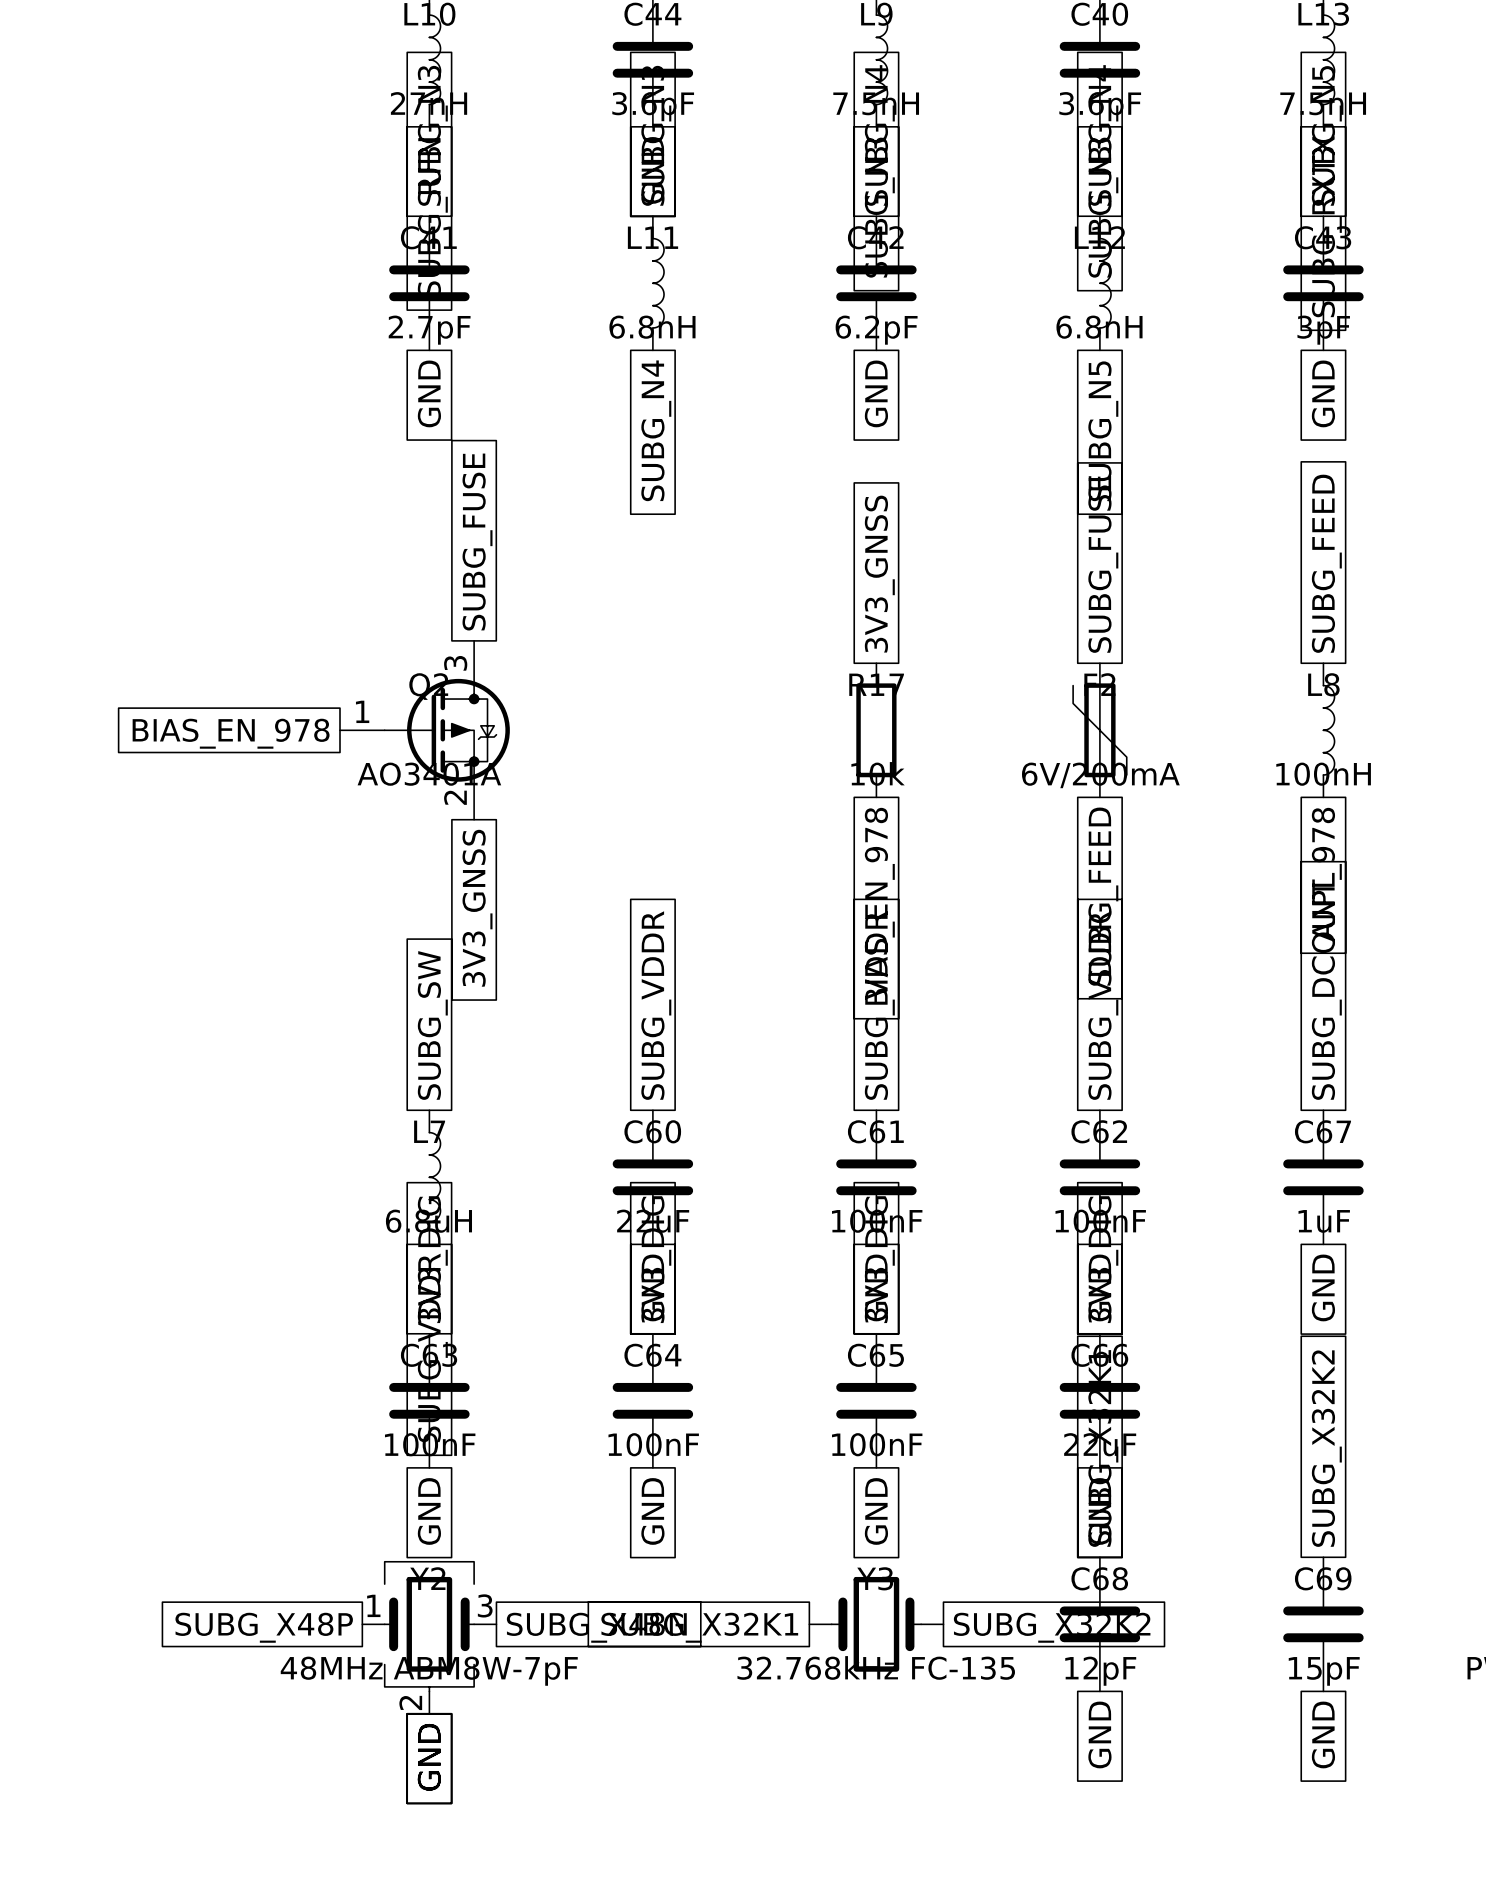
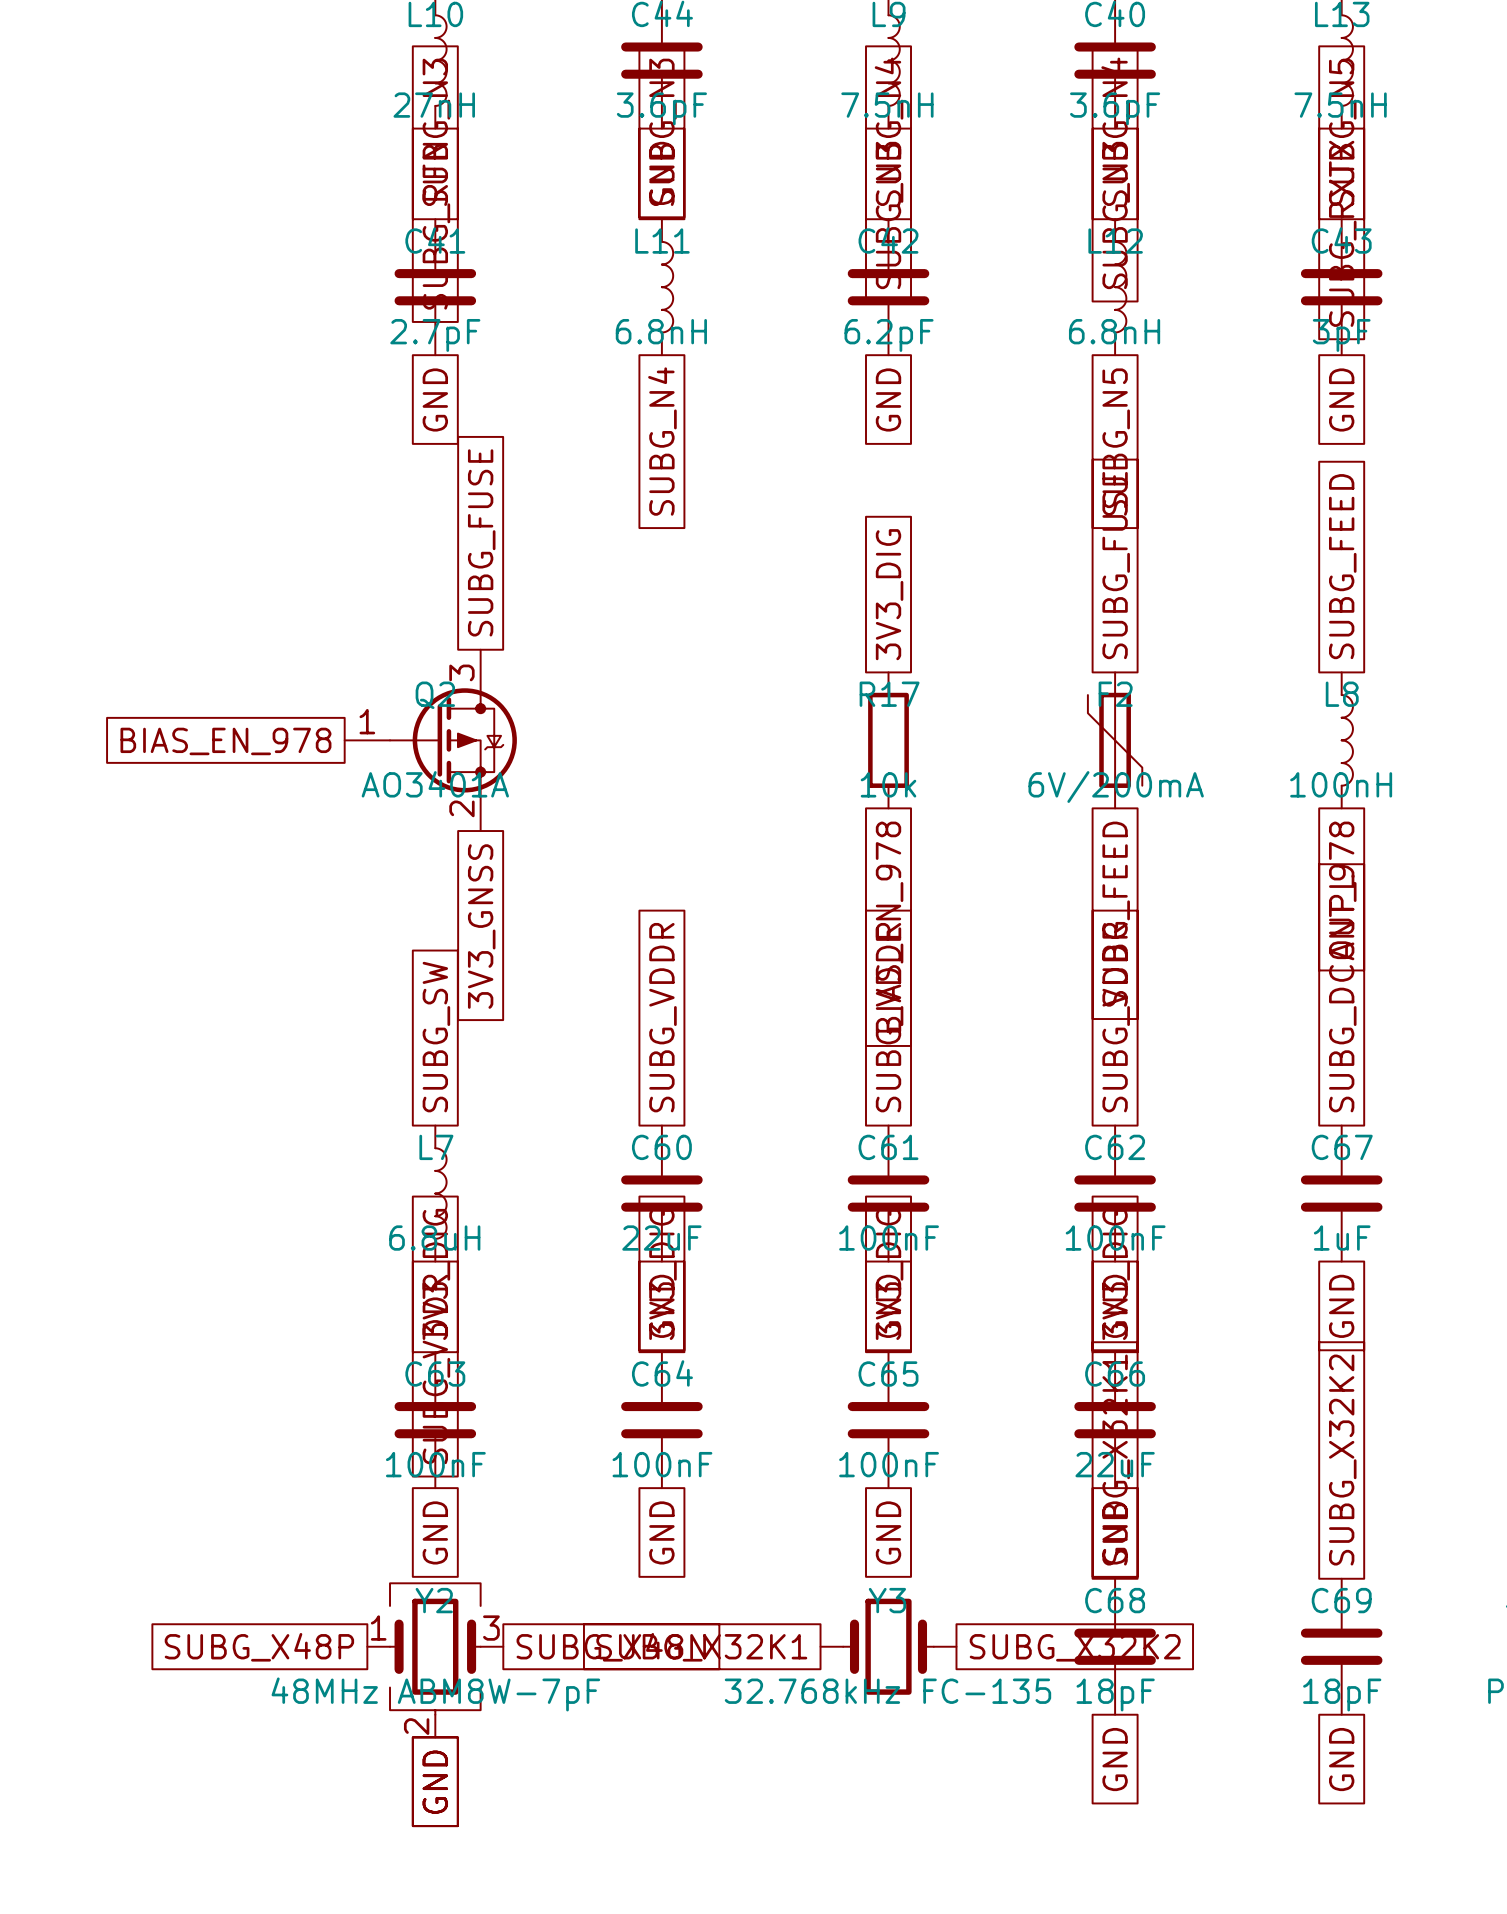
global label: 3V3_GNSS (879, 574) -> 3V3_DIG (889, 594)
C68 value: 12pF (1100, 1671) -> 18pF (1115, 1694)
C69 value: 15pF (1324, 1671) -> 18pF (1342, 1694)

